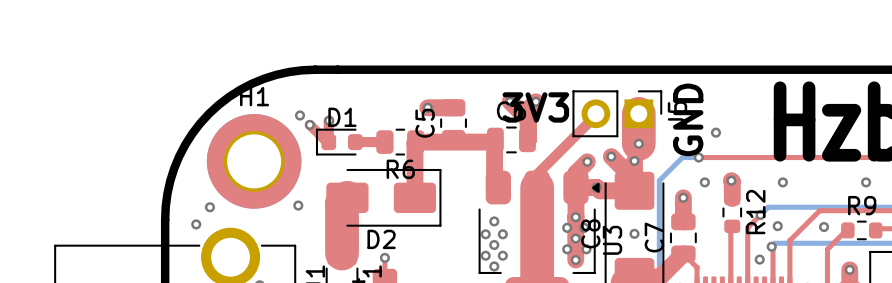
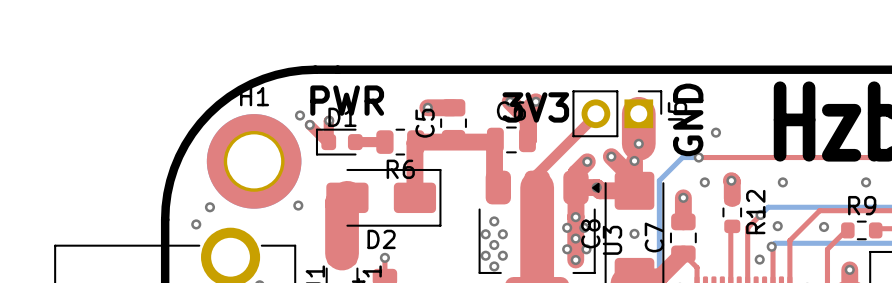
text: none -> PWR (347, 100)

